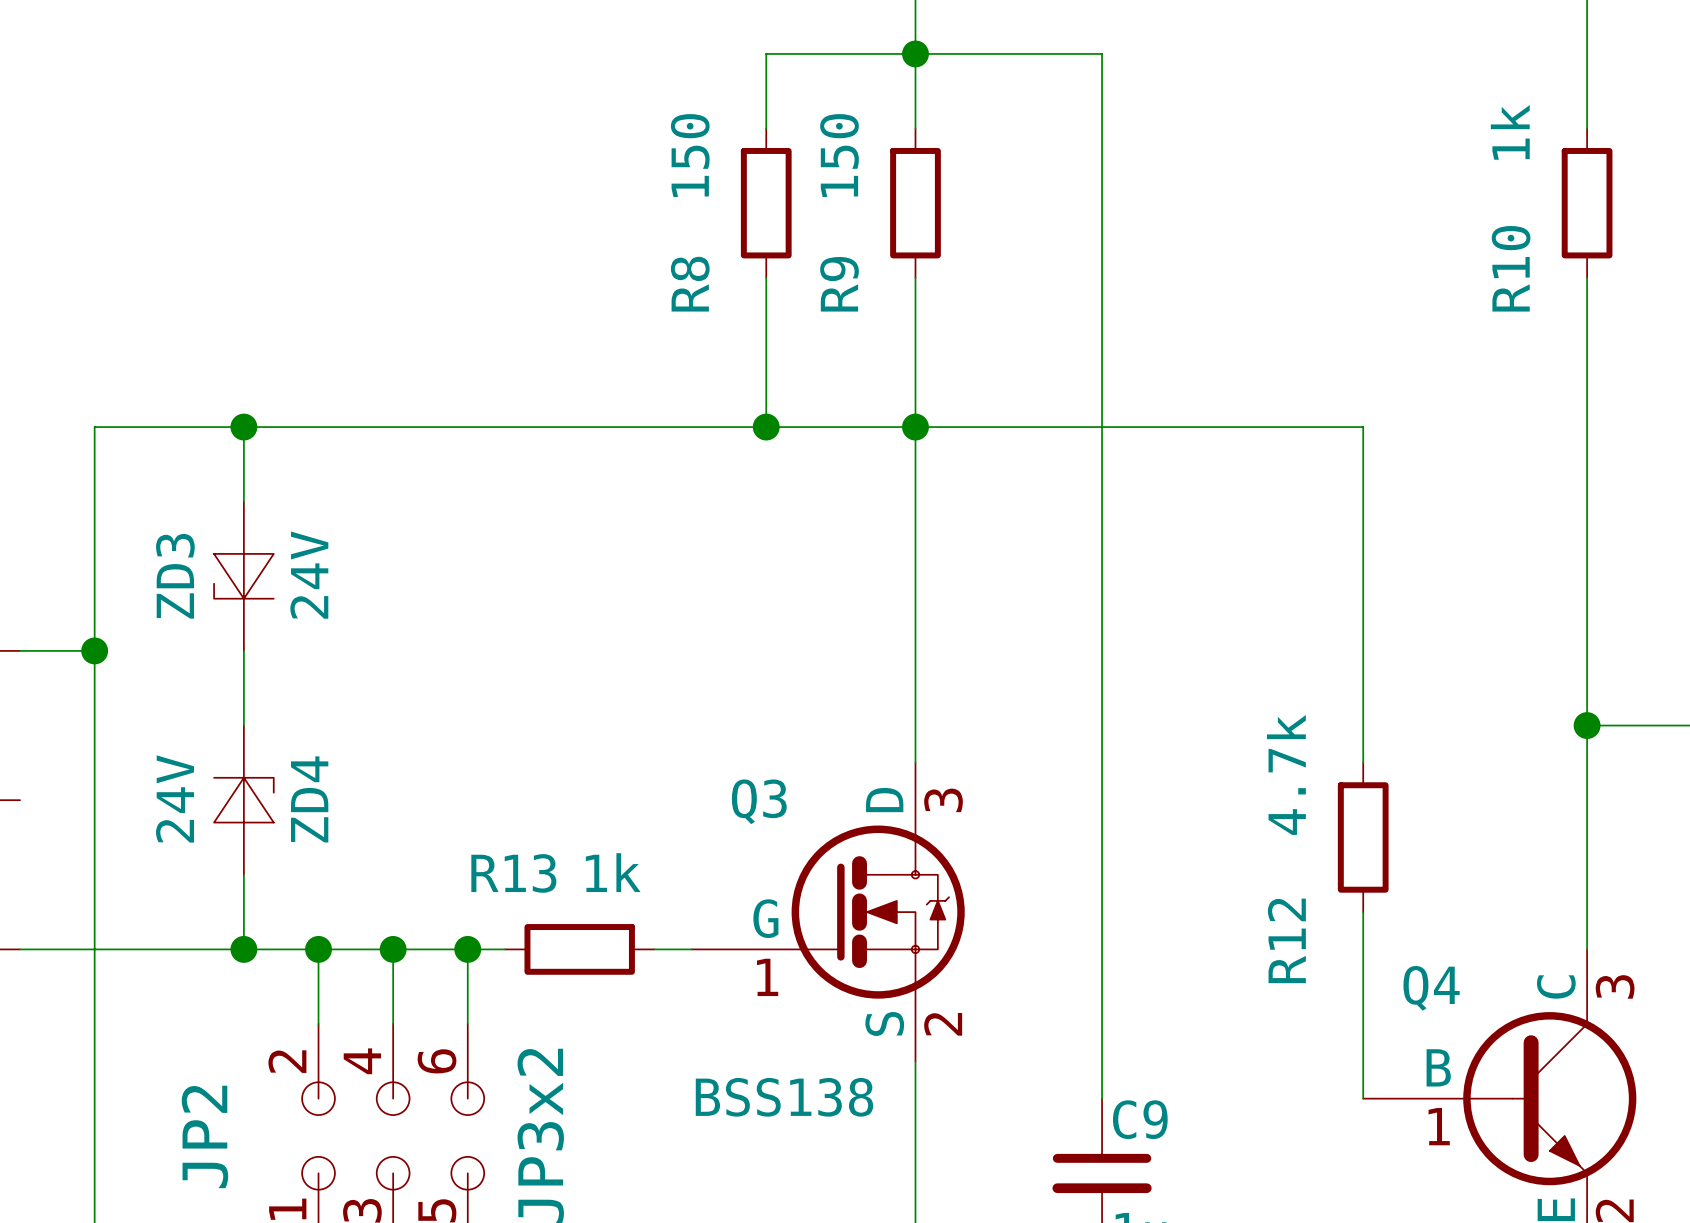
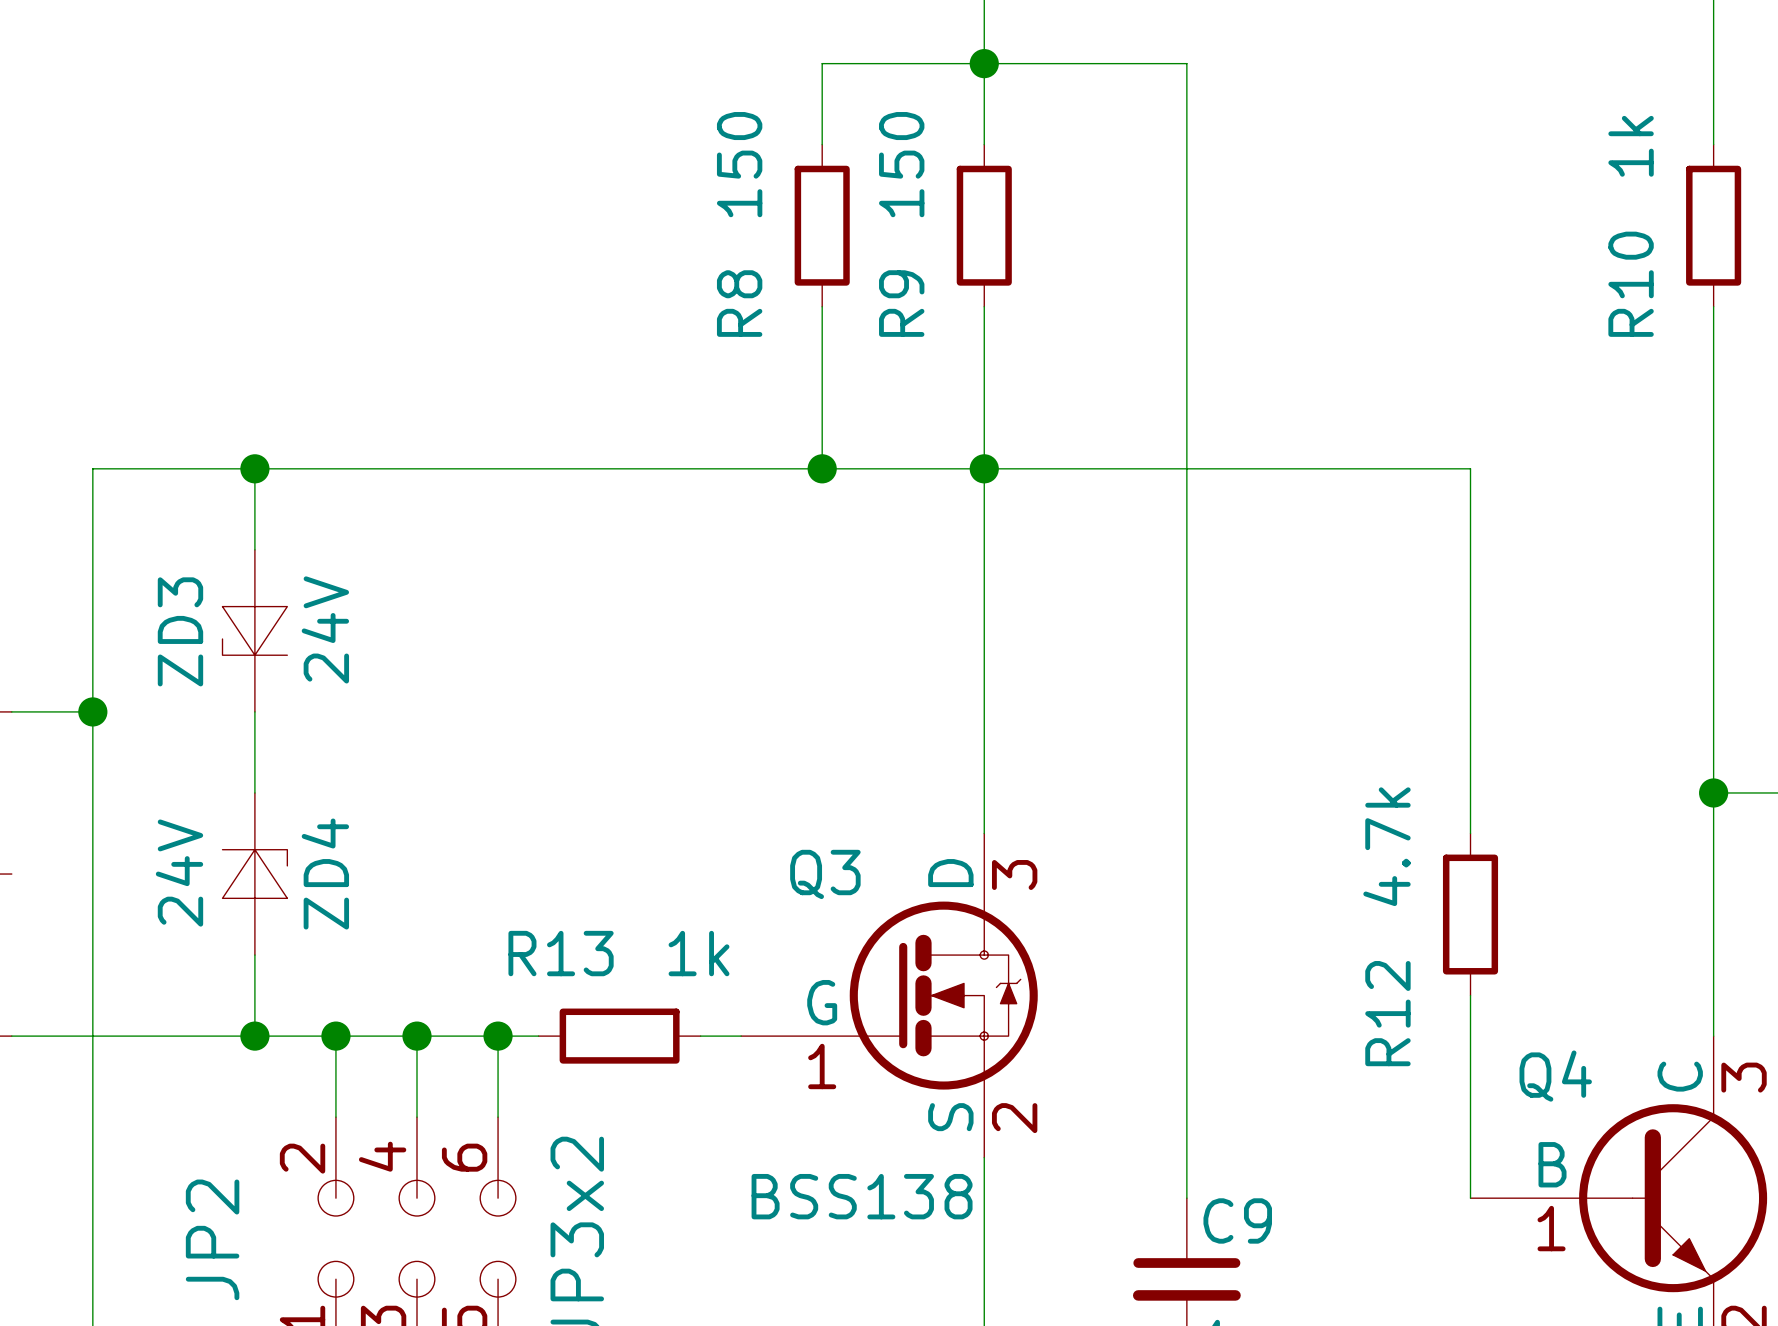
R13 value position: 1k (613, 872) -> 1k (699, 953)

